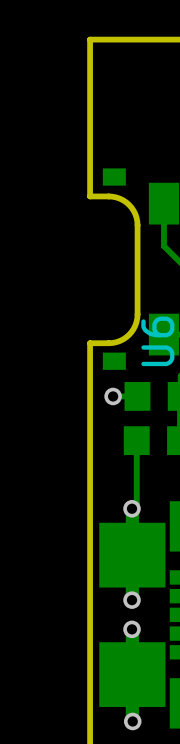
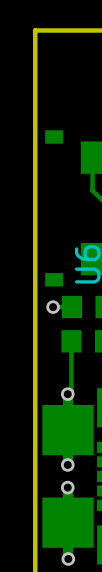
board edge: (90, 196) (112, 196) (123, 200) (133, 210) (137, 225) (137, 314) (135, 325) (129, 334) (119, 341) (90, 343) -> (35, 152) (35, 265)

